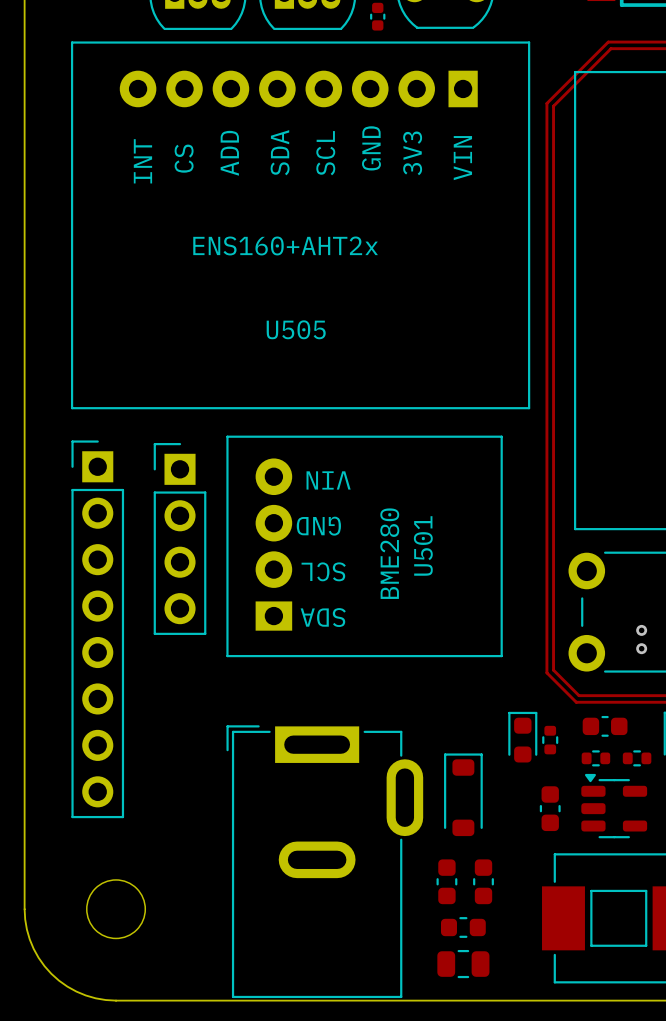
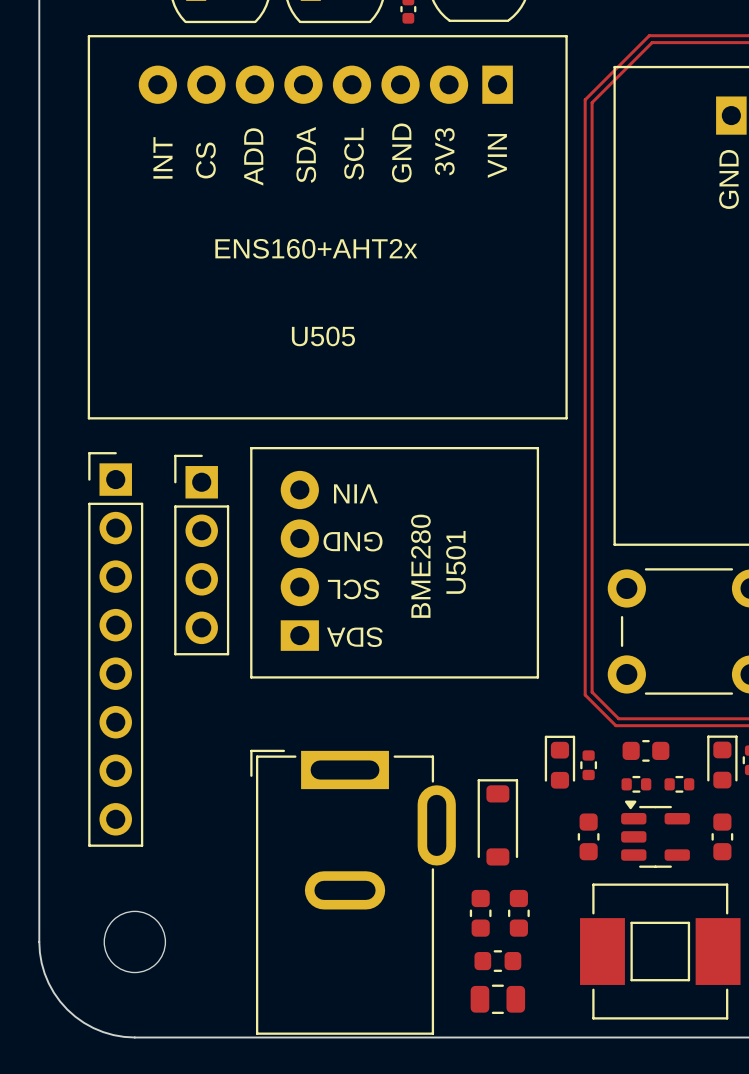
via: (641, 630) -> none
via: (641, 648) -> none

